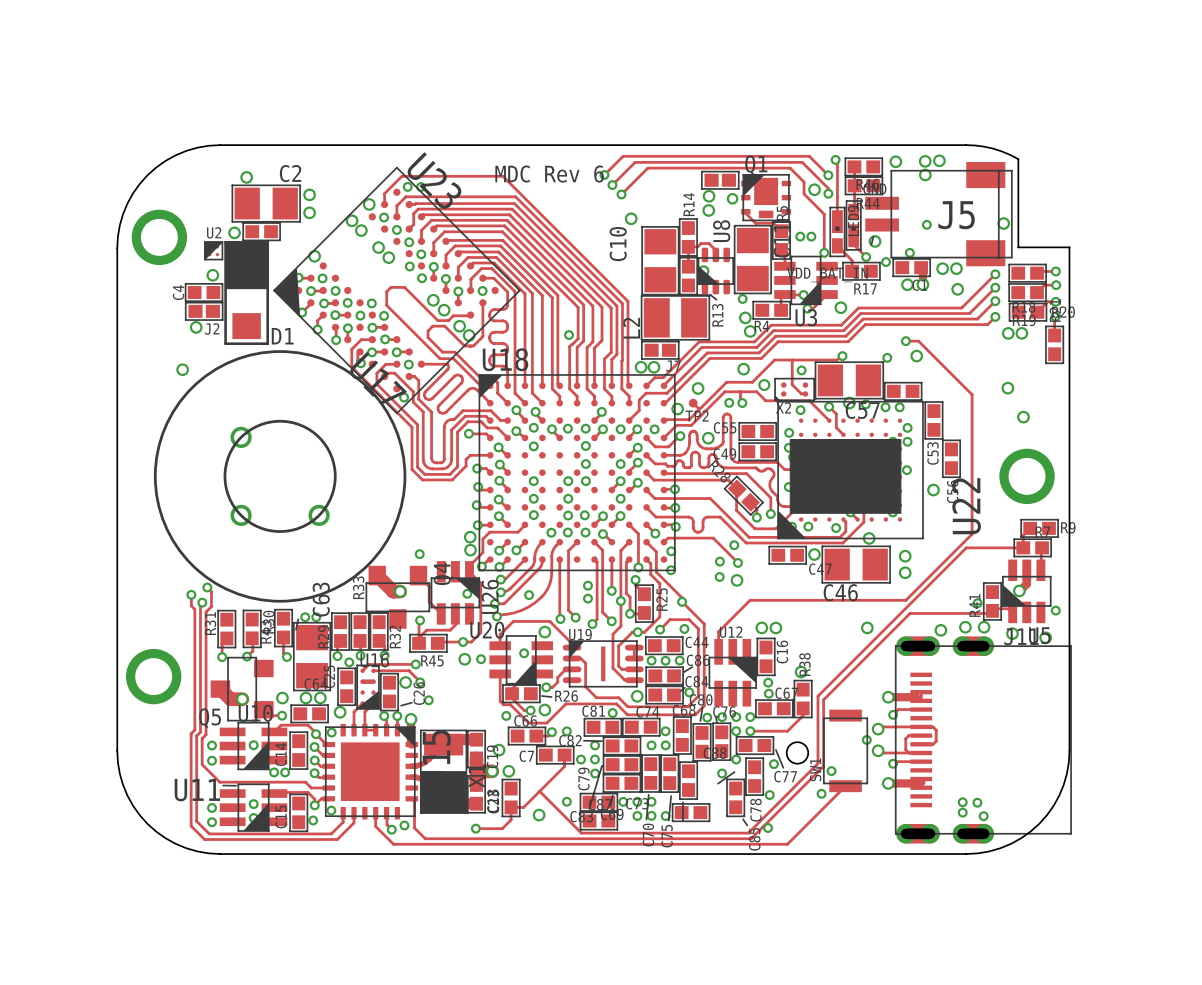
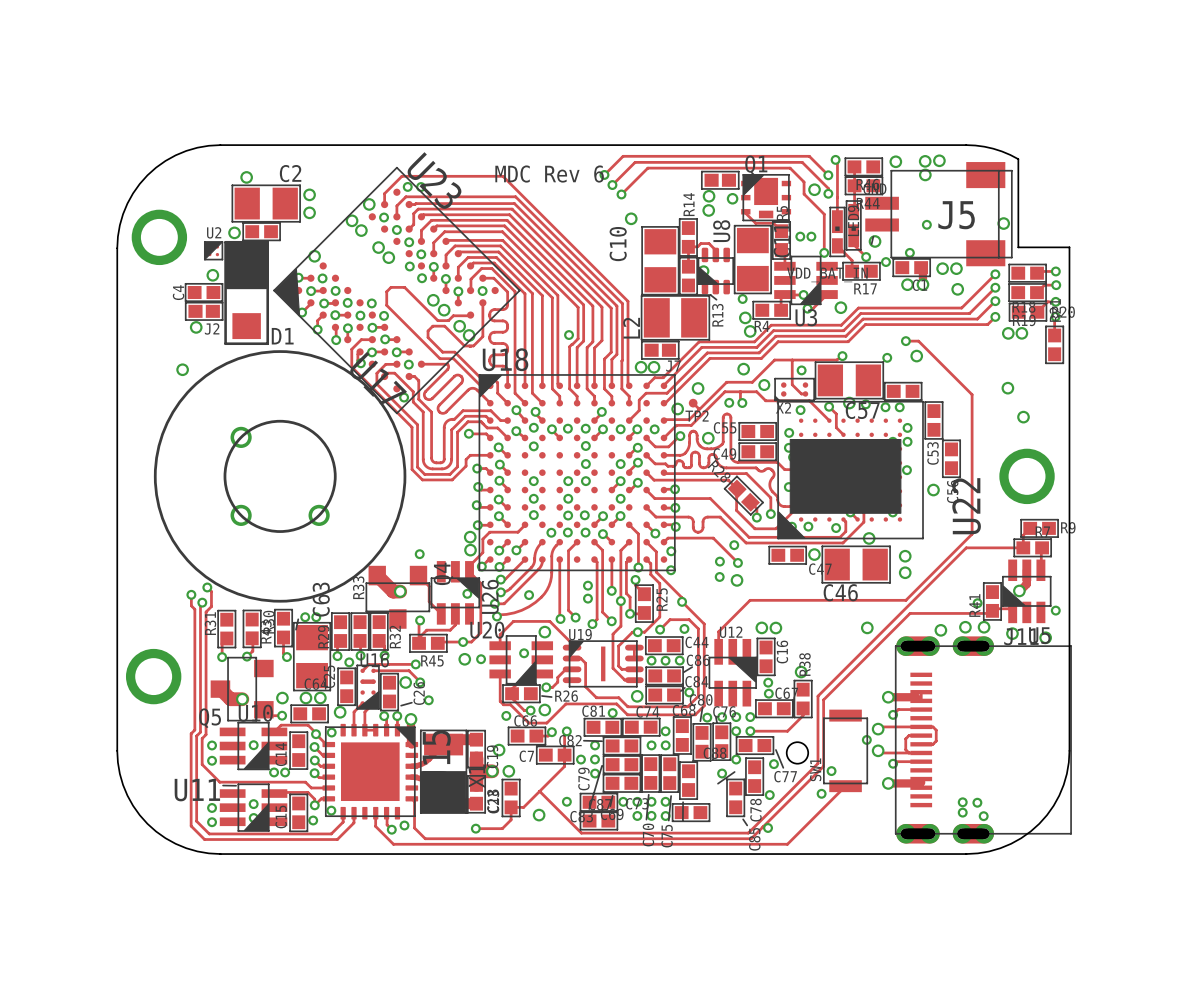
track: none -> (566, 731) (564, 733) (564, 755)
via: none -> (665, 801)

